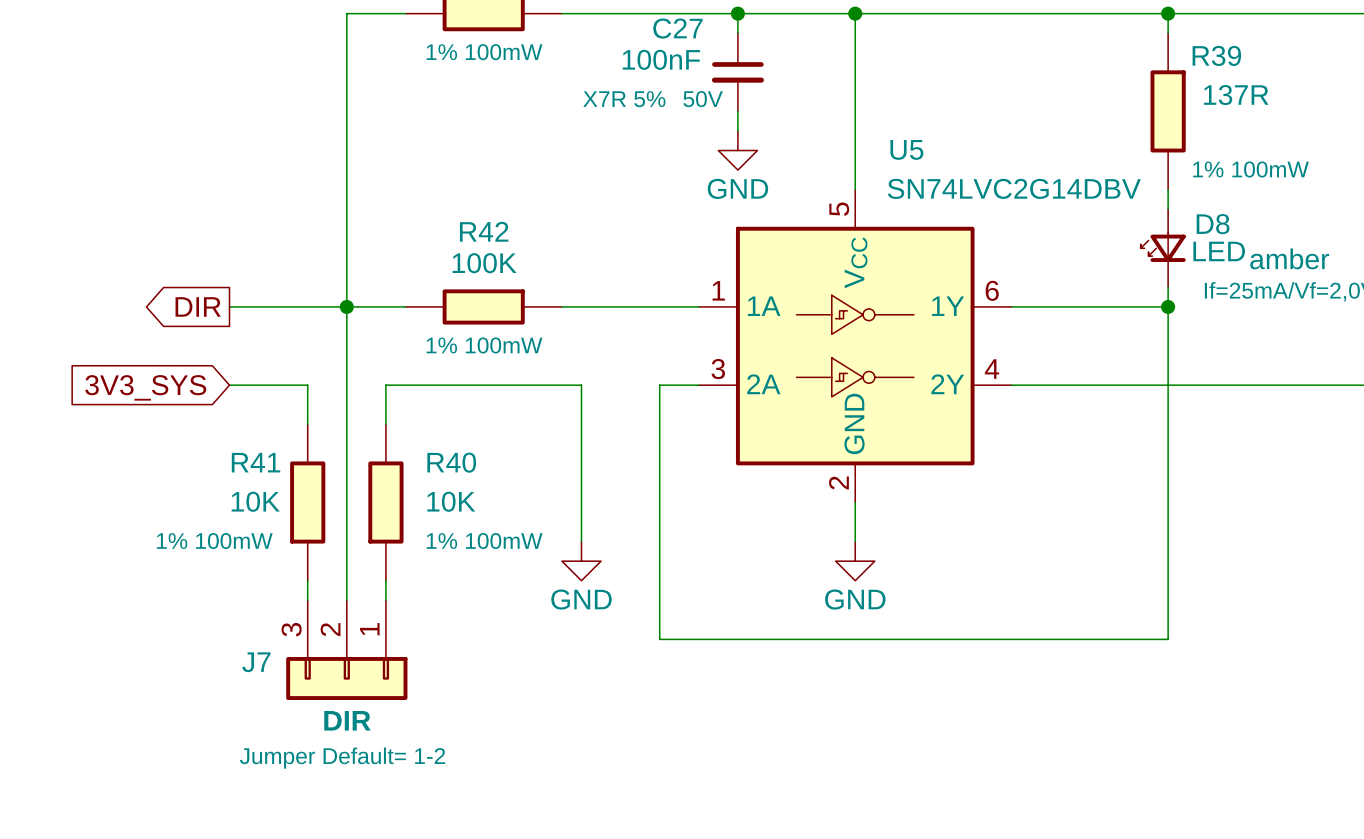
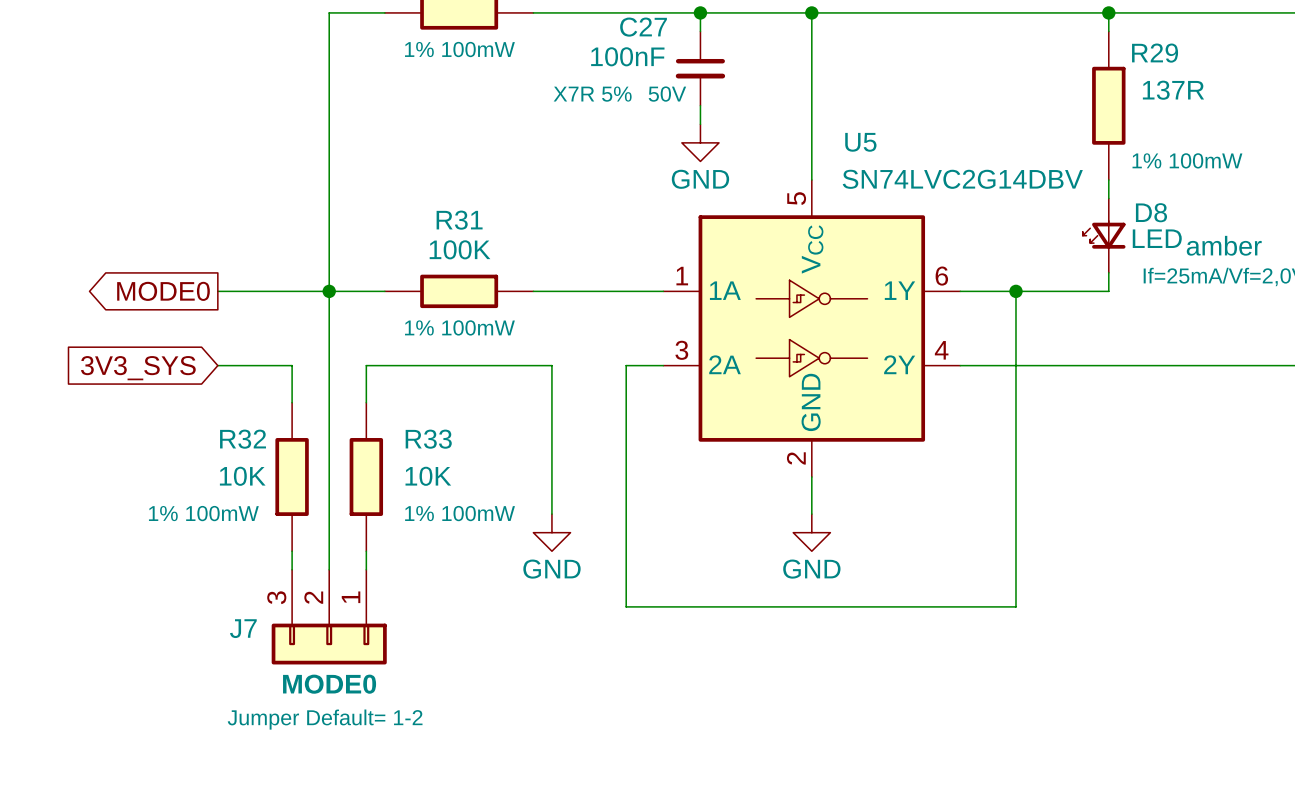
R39 name: R39 (1216, 55) -> R29 (1155, 53)
R42 name: R42 (484, 231) -> R31 (459, 220)
global label: DIR (198, 306) -> MODE0 (163, 291)
junction: none -> (1015, 291)
wire: (1168, 306) (1168, 639) (1070, 639) -> (1015, 291) (1015, 606)
junction: (1168, 306) -> none
R41 name: R41 (256, 462) -> R32 (243, 439)
R40 name: R40 (451, 462) -> R33 (428, 439)
J7 value: DIR (347, 720) -> MODE0 (329, 684)

